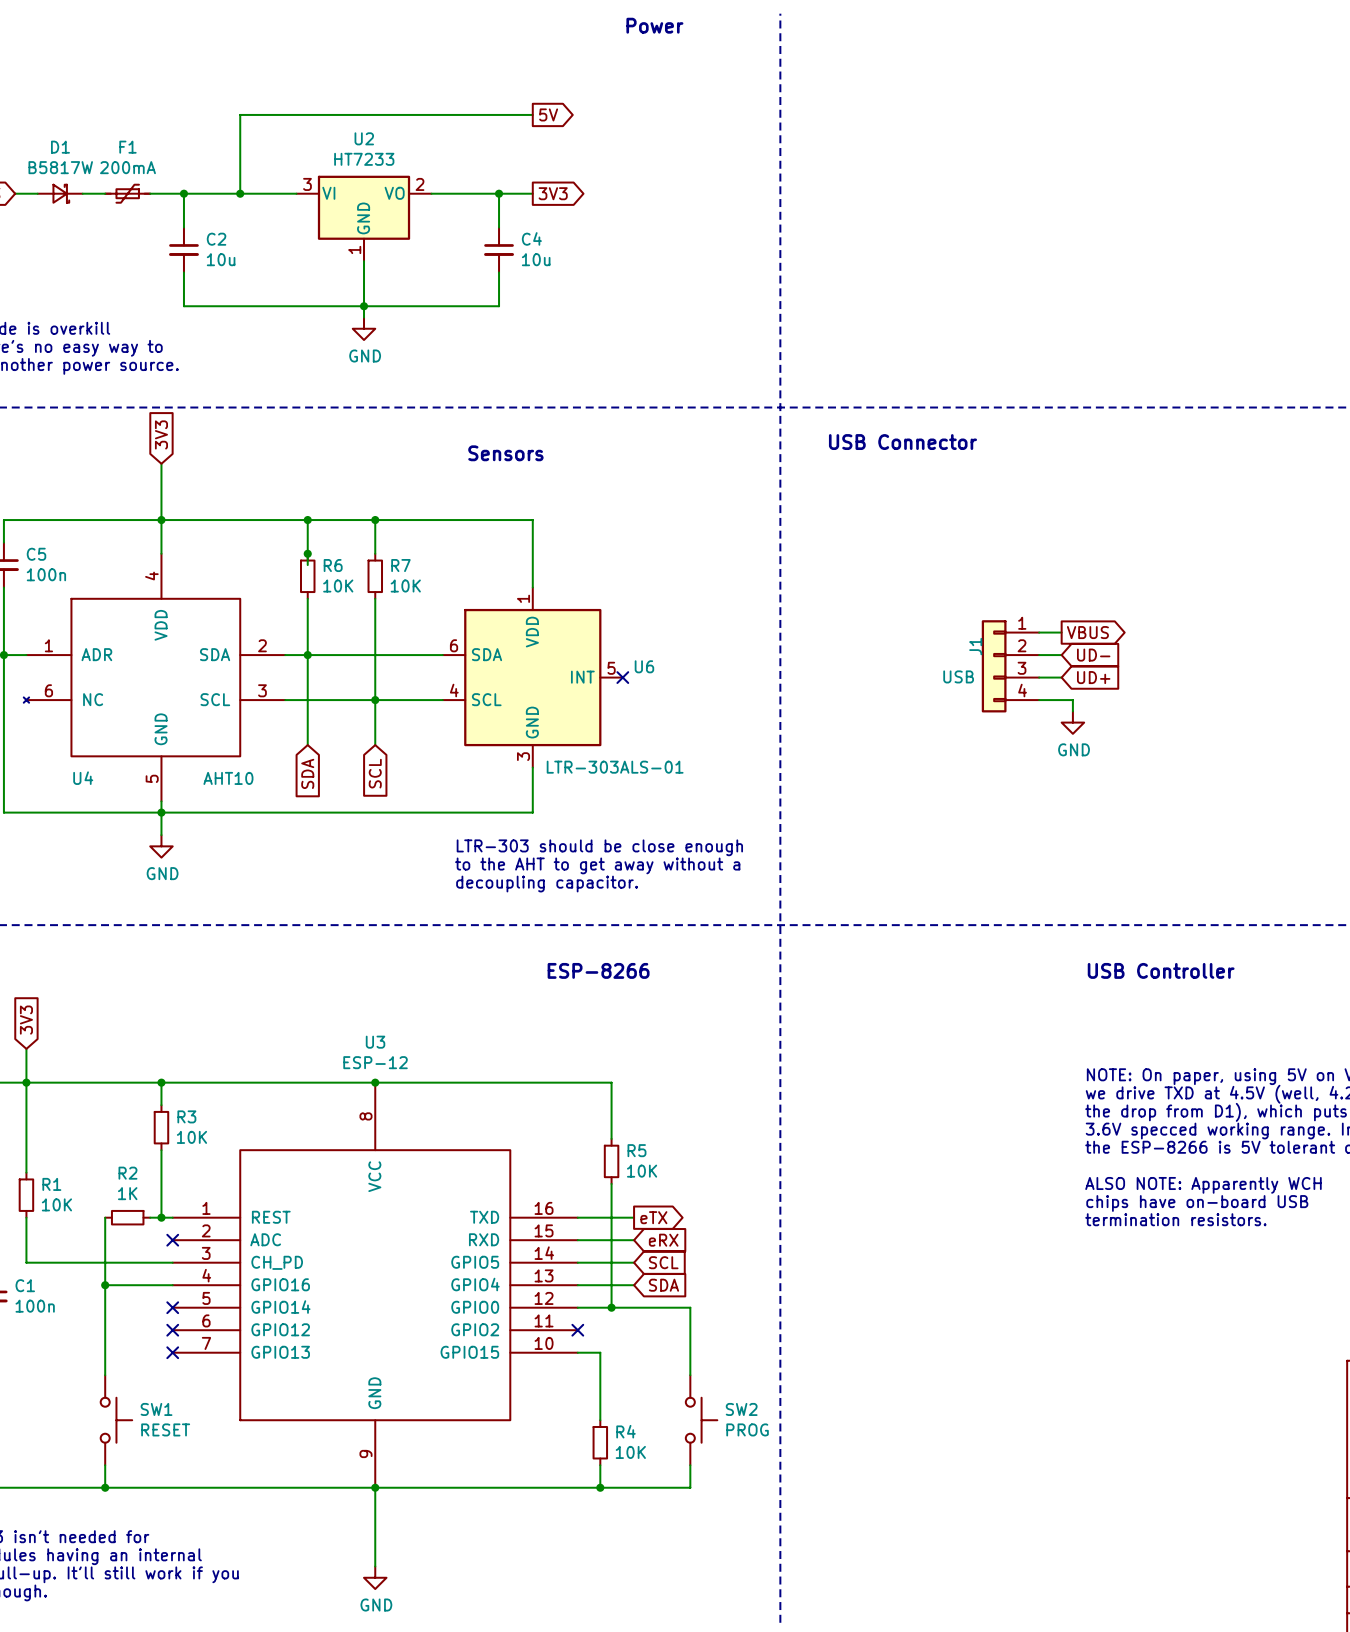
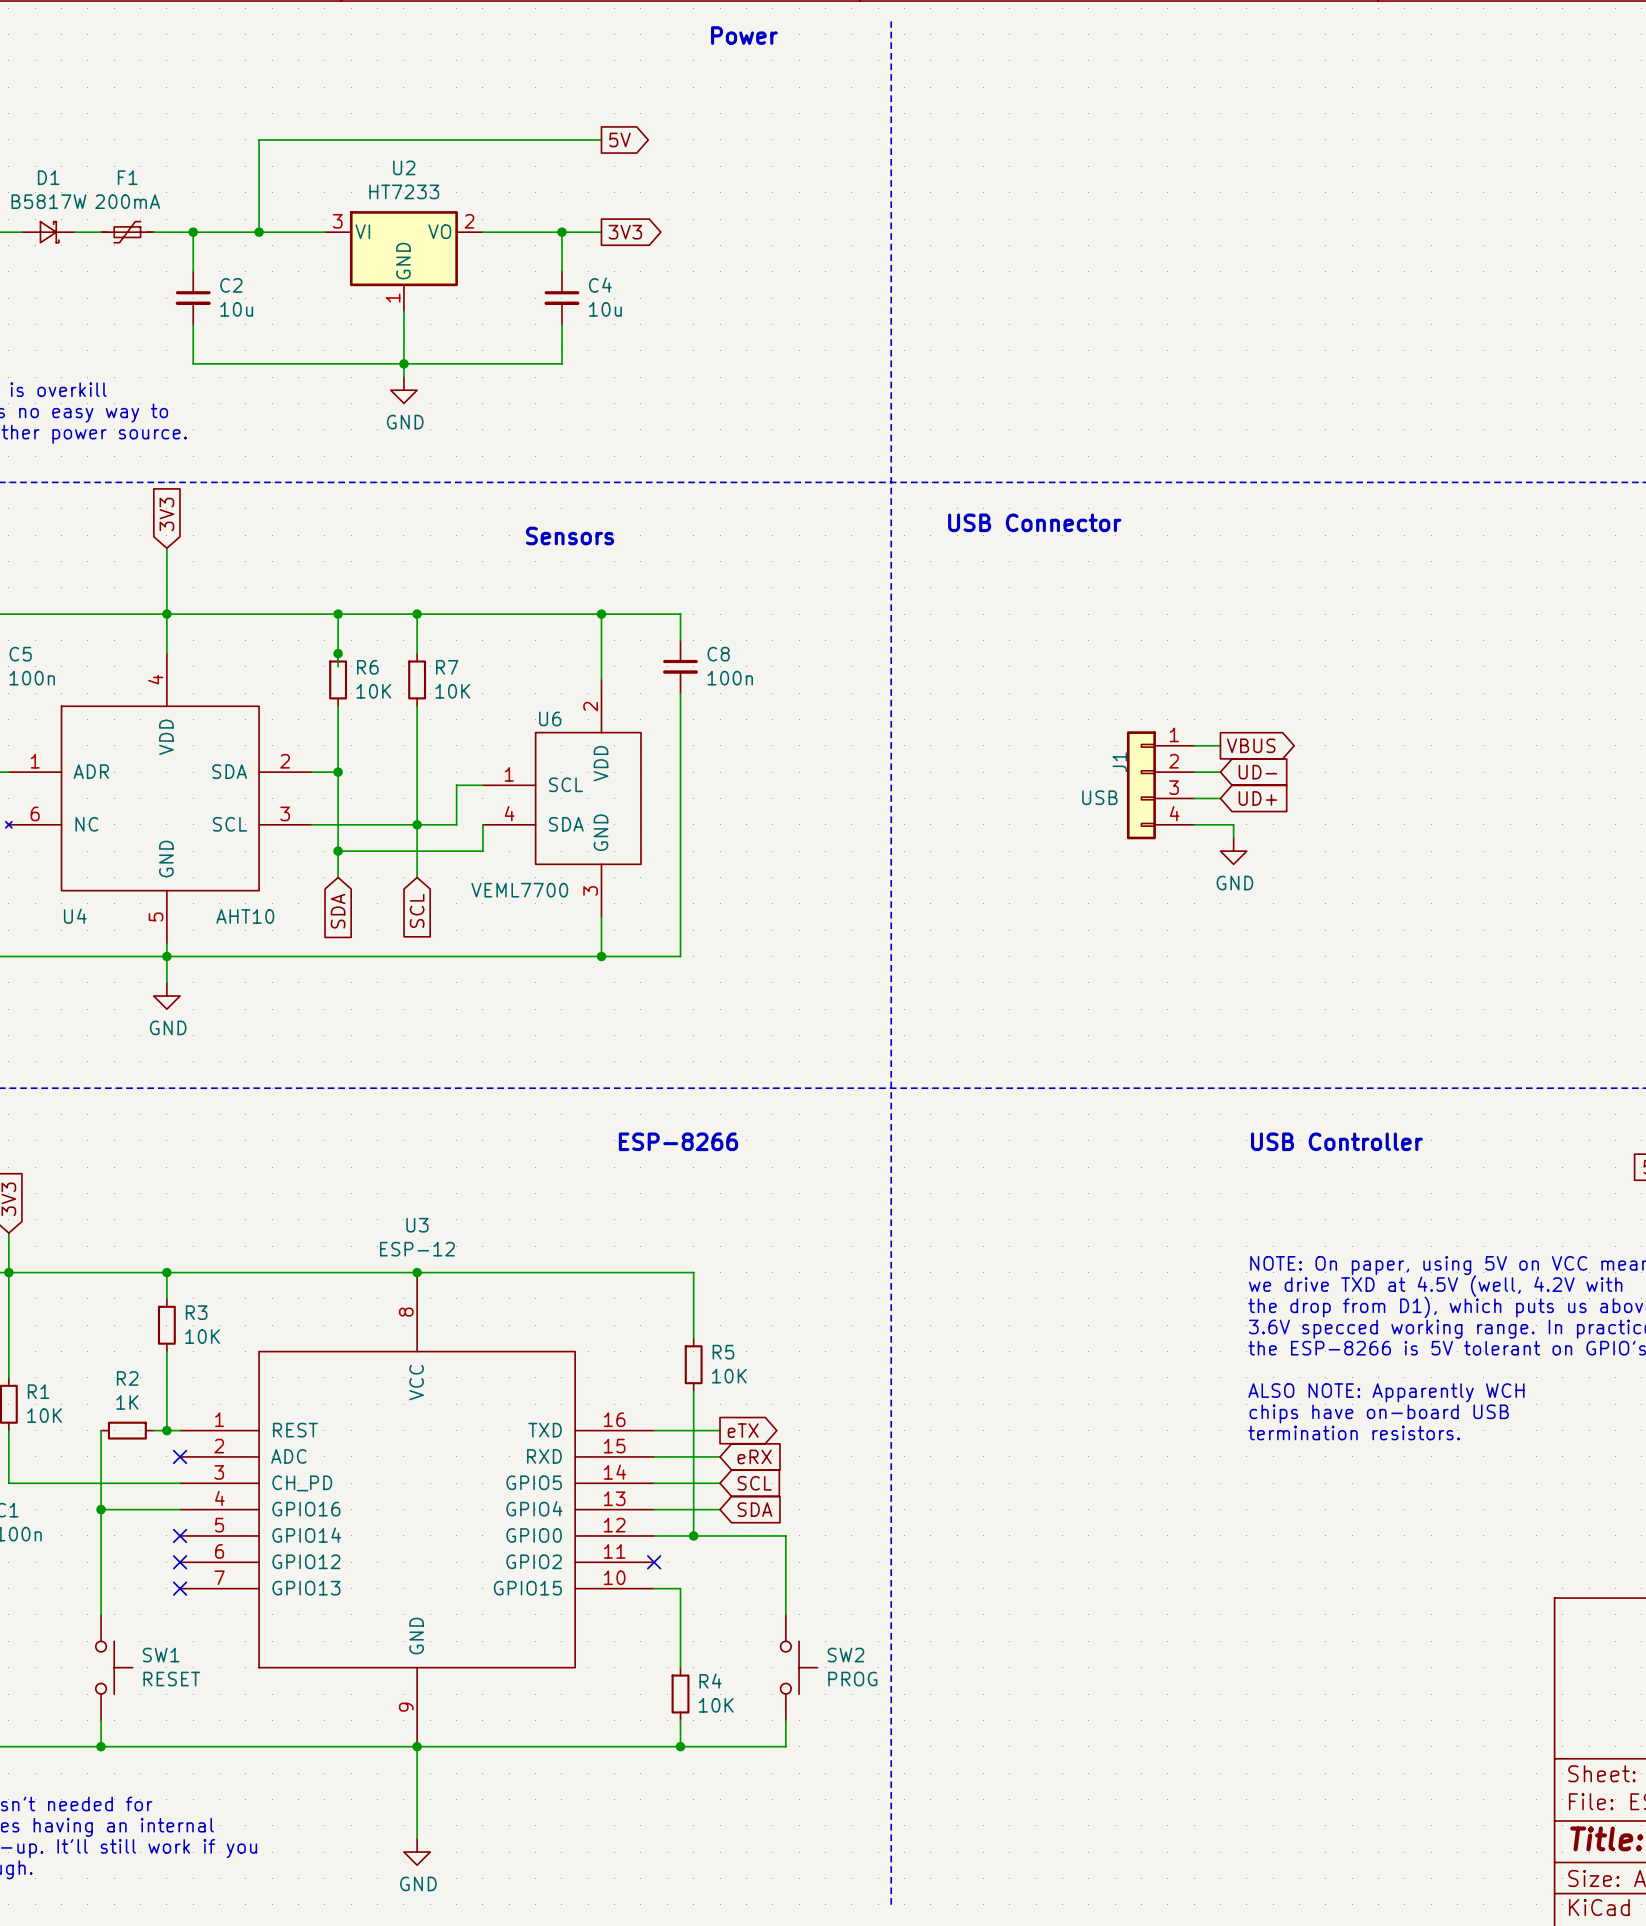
wire: none -> (601, 614) (680, 614) (680, 640)
junction: none -> (601, 614)
C8: none -> 100n (680, 666)
U6 symbol: [442, 587, 623, 768] -> [482, 679, 641, 917]
wire: none -> (680, 693) (680, 956) (601, 956)
wire: (307, 655) (442, 655) -> none
U6 name position: U6 (644, 666) -> U6 (550, 718)
no-connect mark: (622, 677) -> none
wire: (409, 700) (442, 700) -> (456, 824) (456, 785) (482, 785)
wire: none -> (482, 824) (482, 851) (338, 851)
junction: none -> (338, 851)
U6 value: LTR-303ALS-01 (615, 767) -> VEML7700 (519, 890)
junction: none -> (601, 956)
text: LTR-303 should be close enough (599, 847) -> none
text: to the AHT to get away without a (597, 865) -> none
text: decoupling capacitor. (547, 884) -> none

